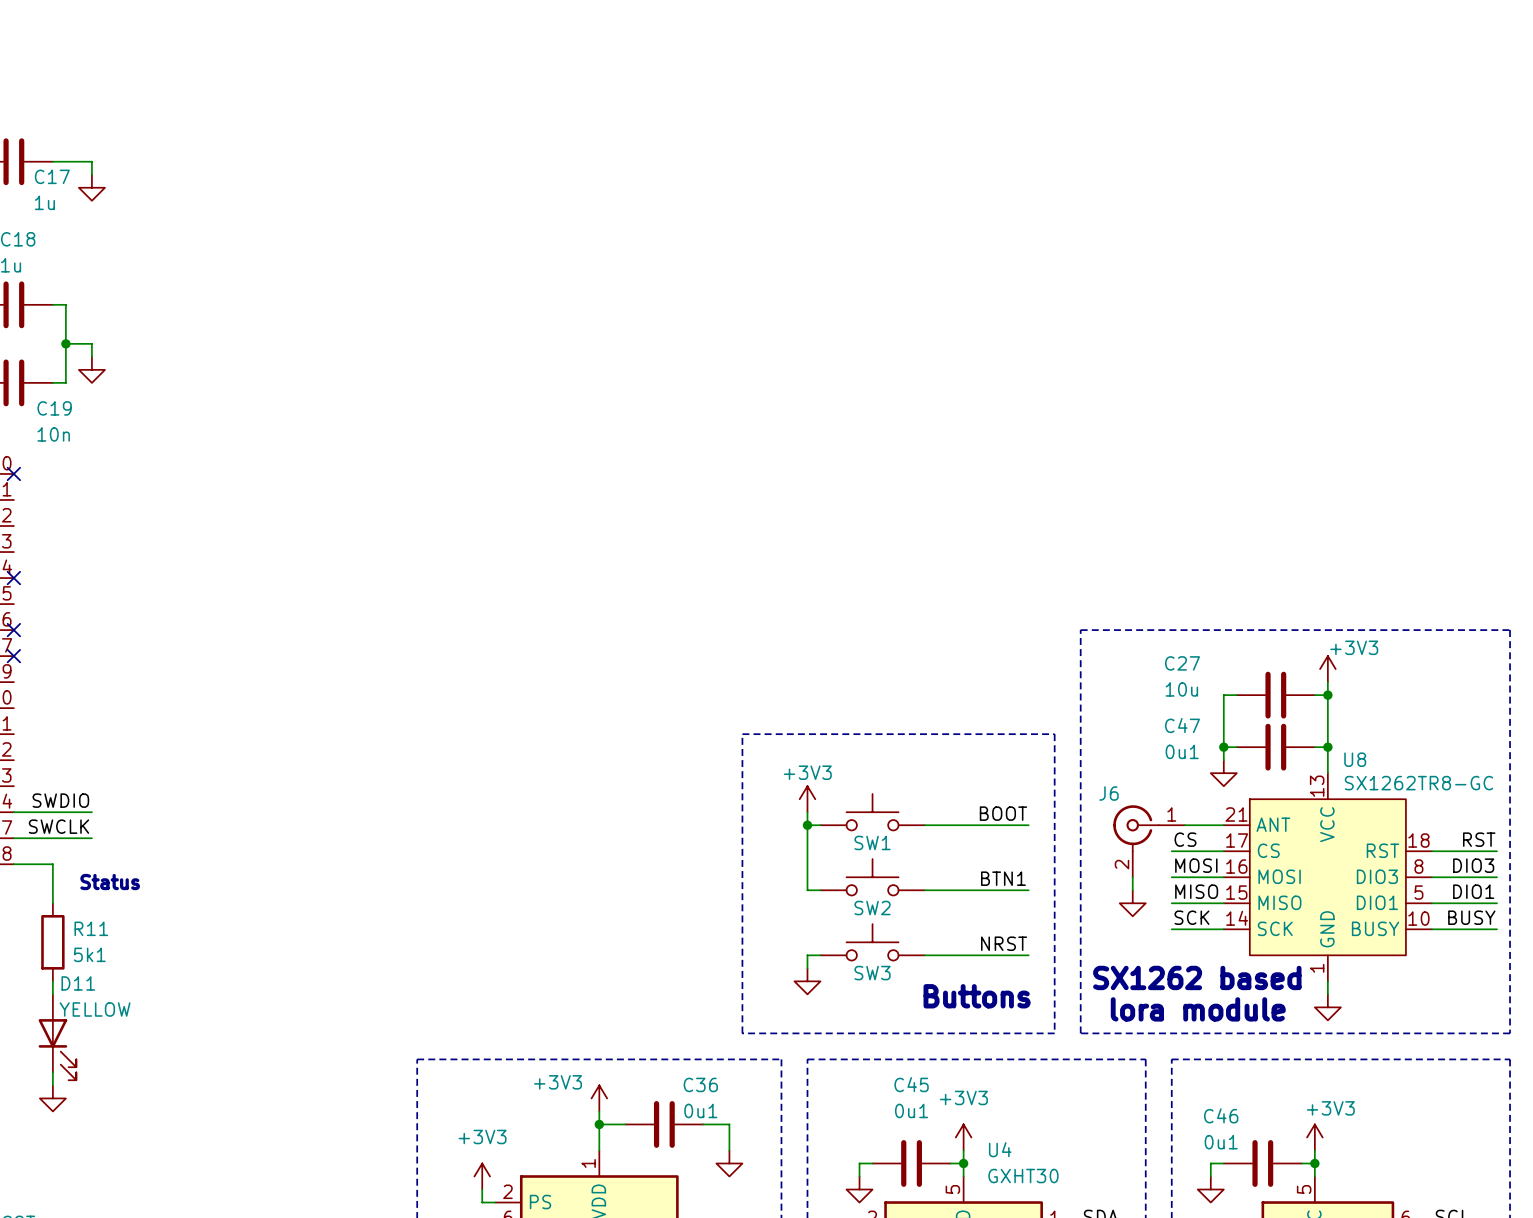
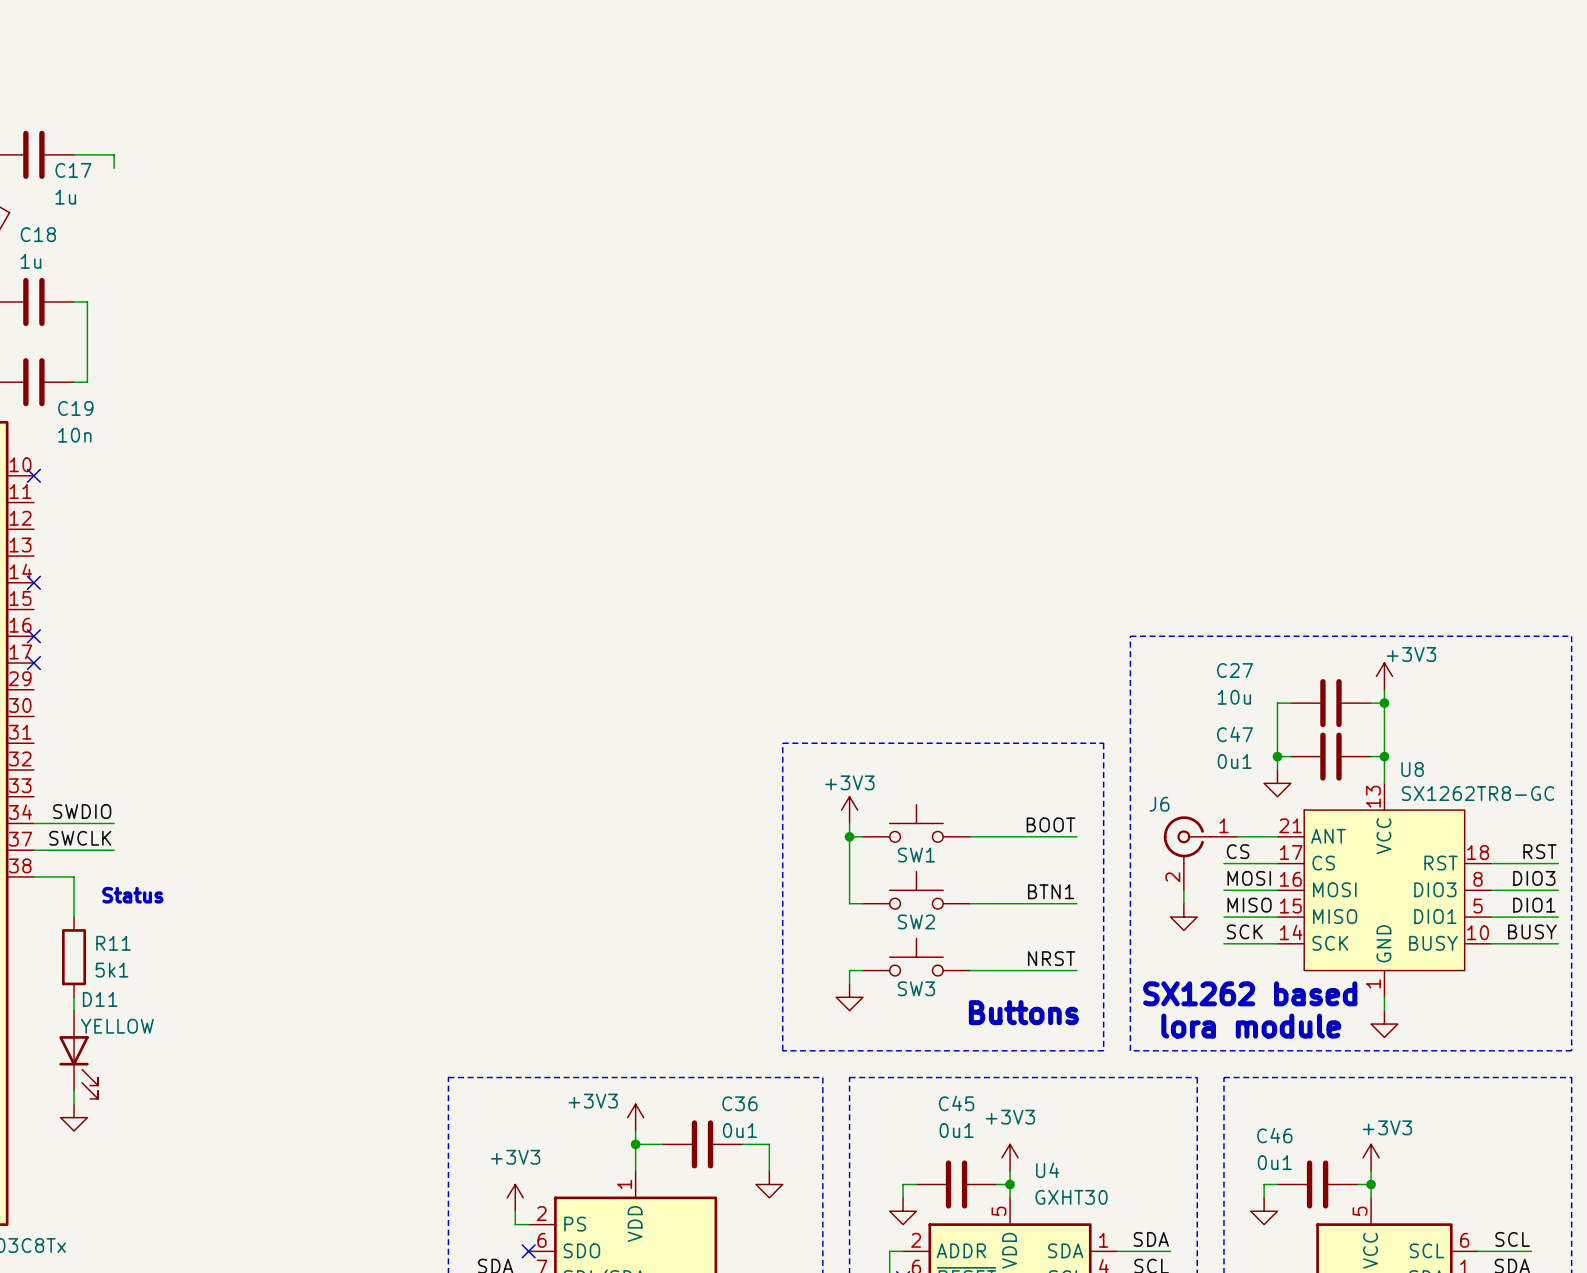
power symbol: (91, 187) -> none
wire: (65, 343) (91, 343) (91, 356) -> none
junction: (65, 343) -> none
power symbol: (91, 369) -> none

